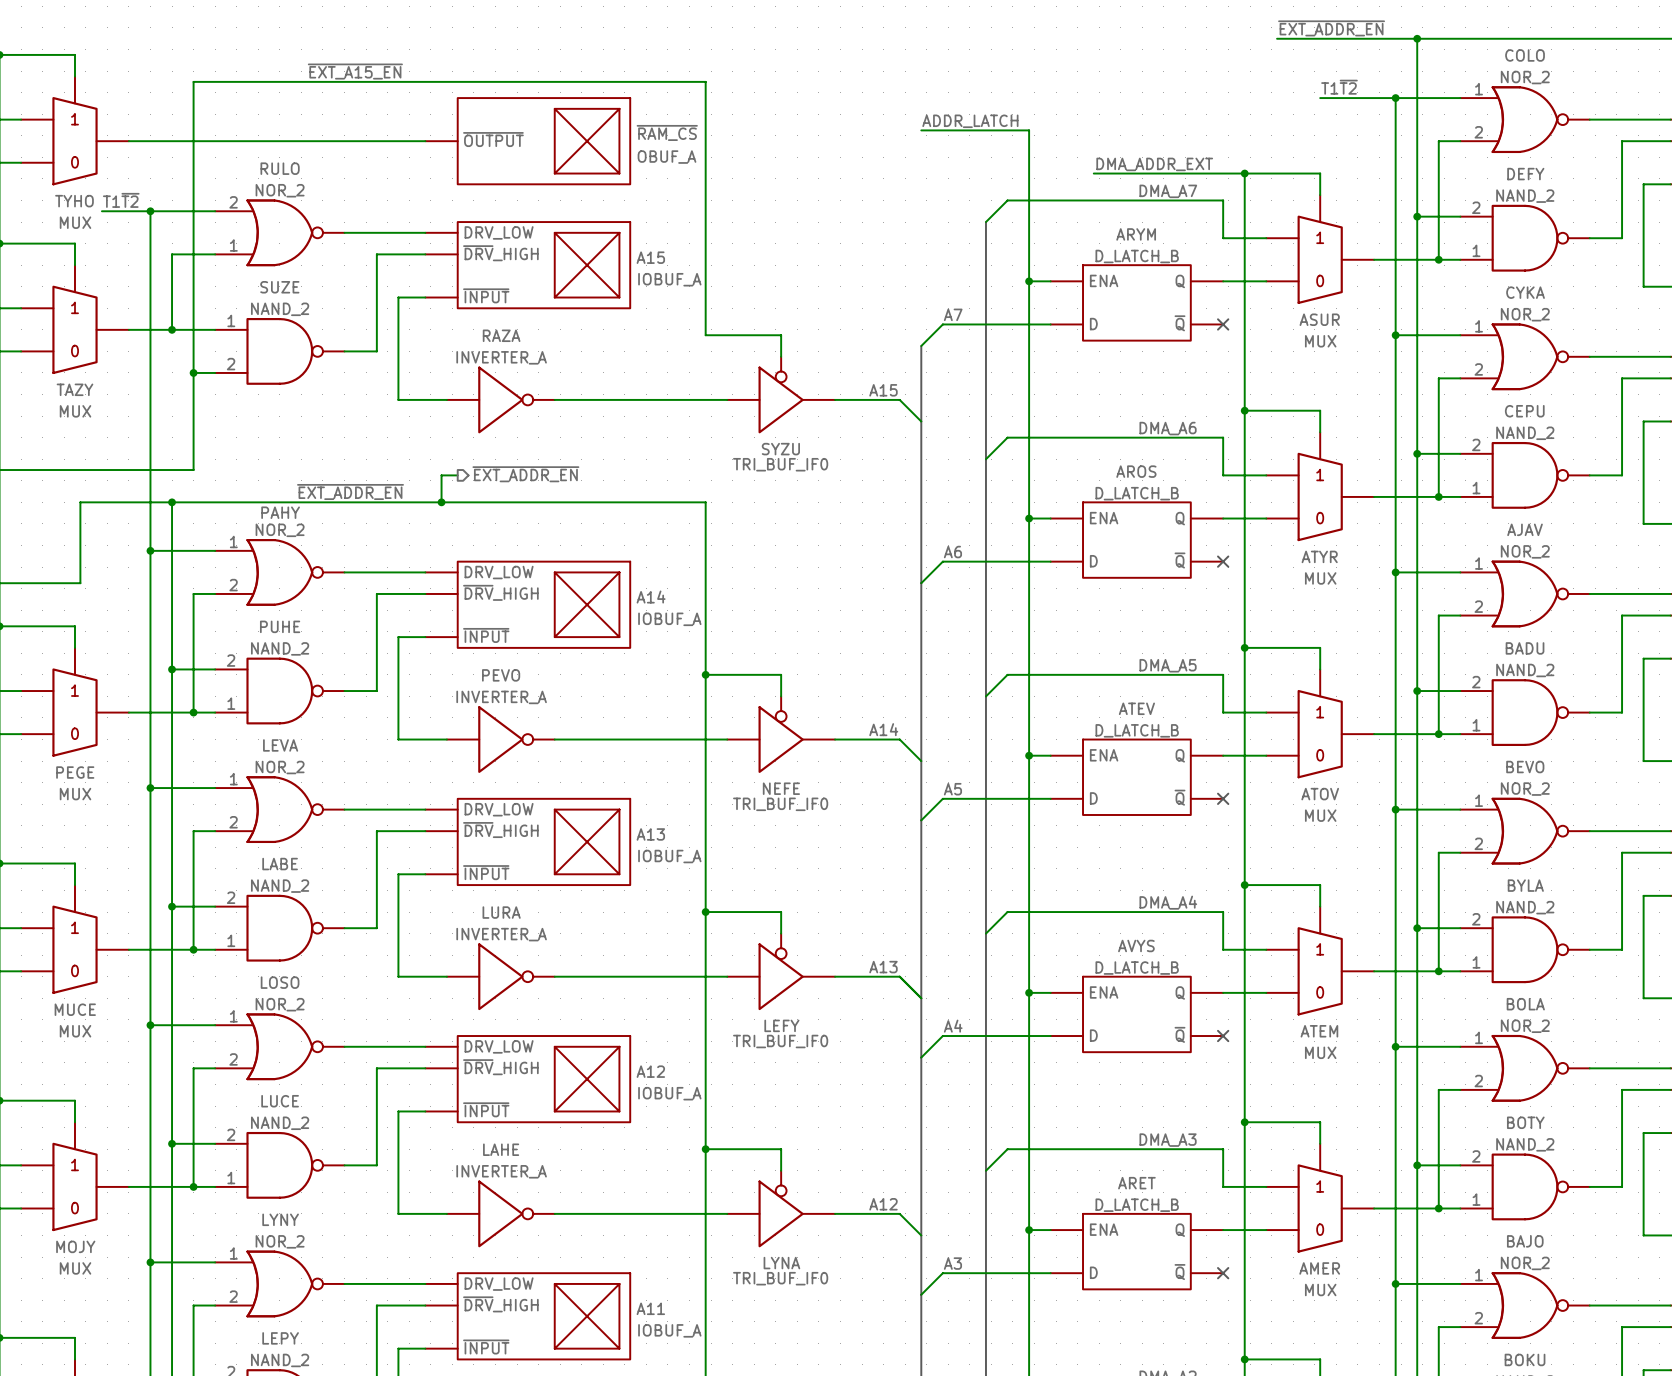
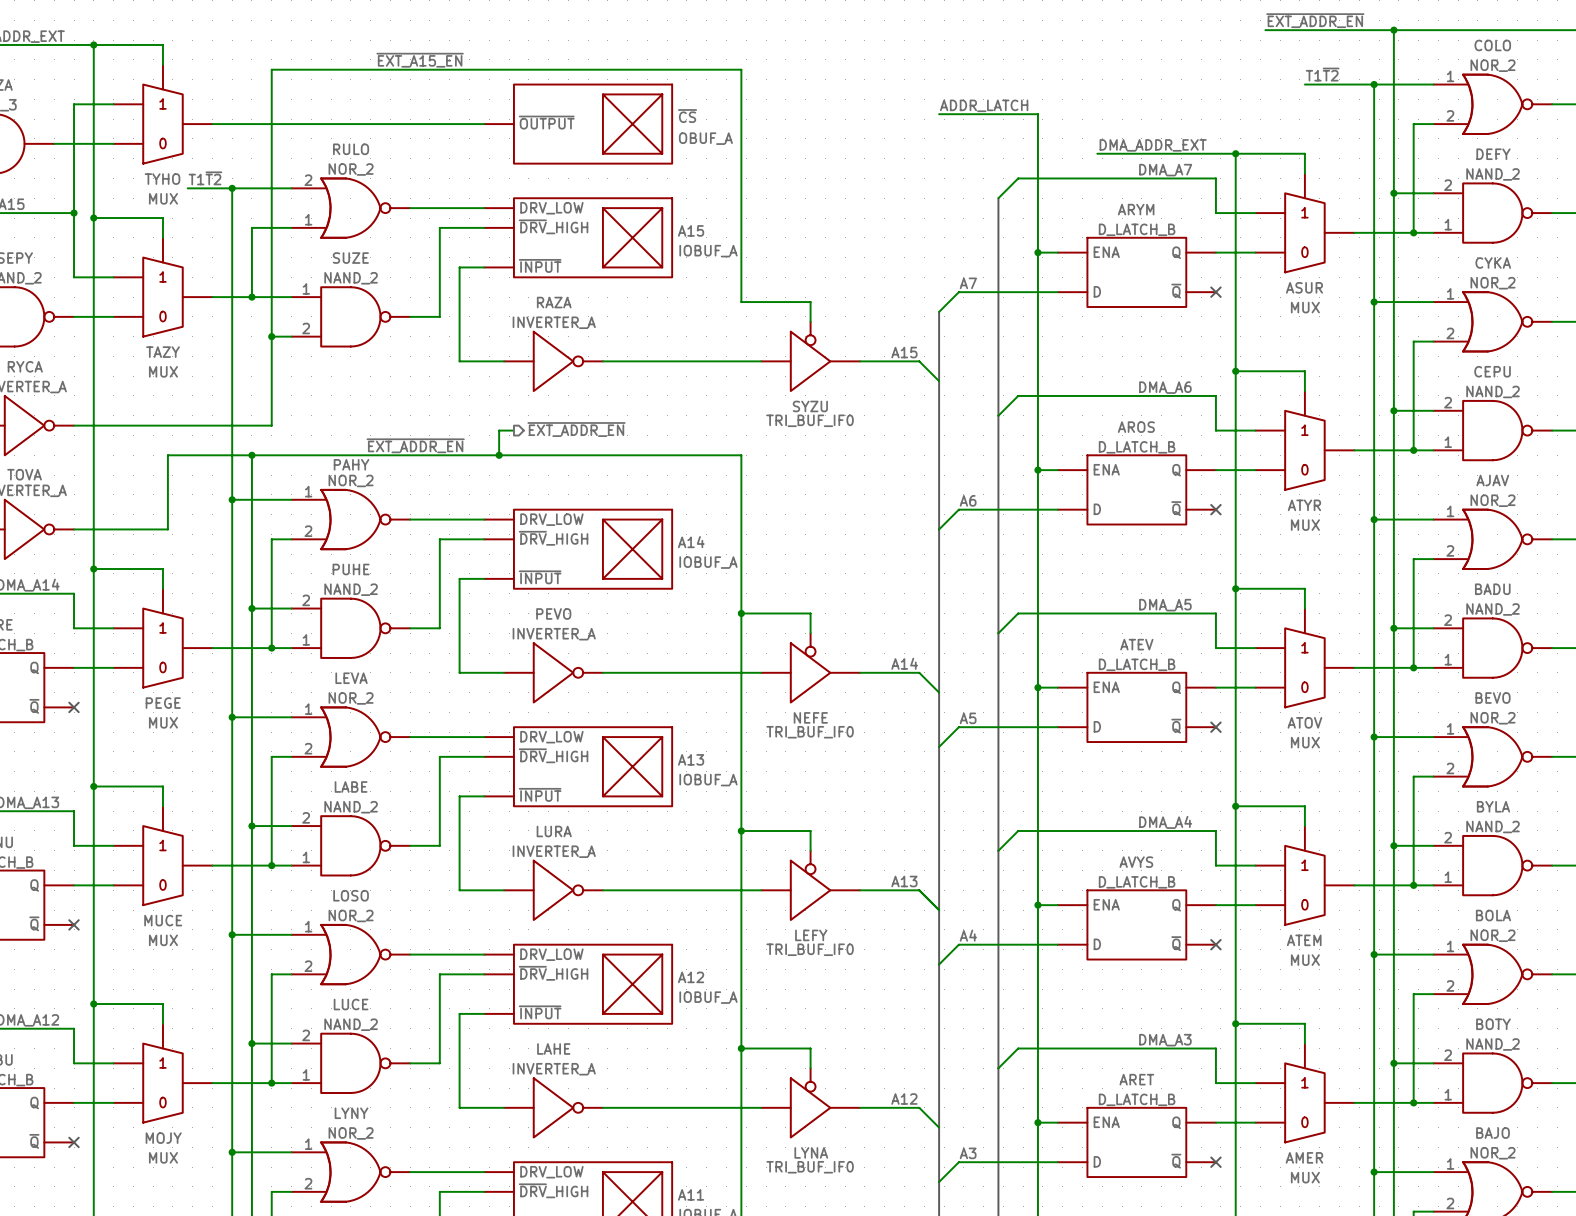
~{RAM_CS} name: ~{RAM_CS} (667, 132) -> ~{CS} (687, 116)

